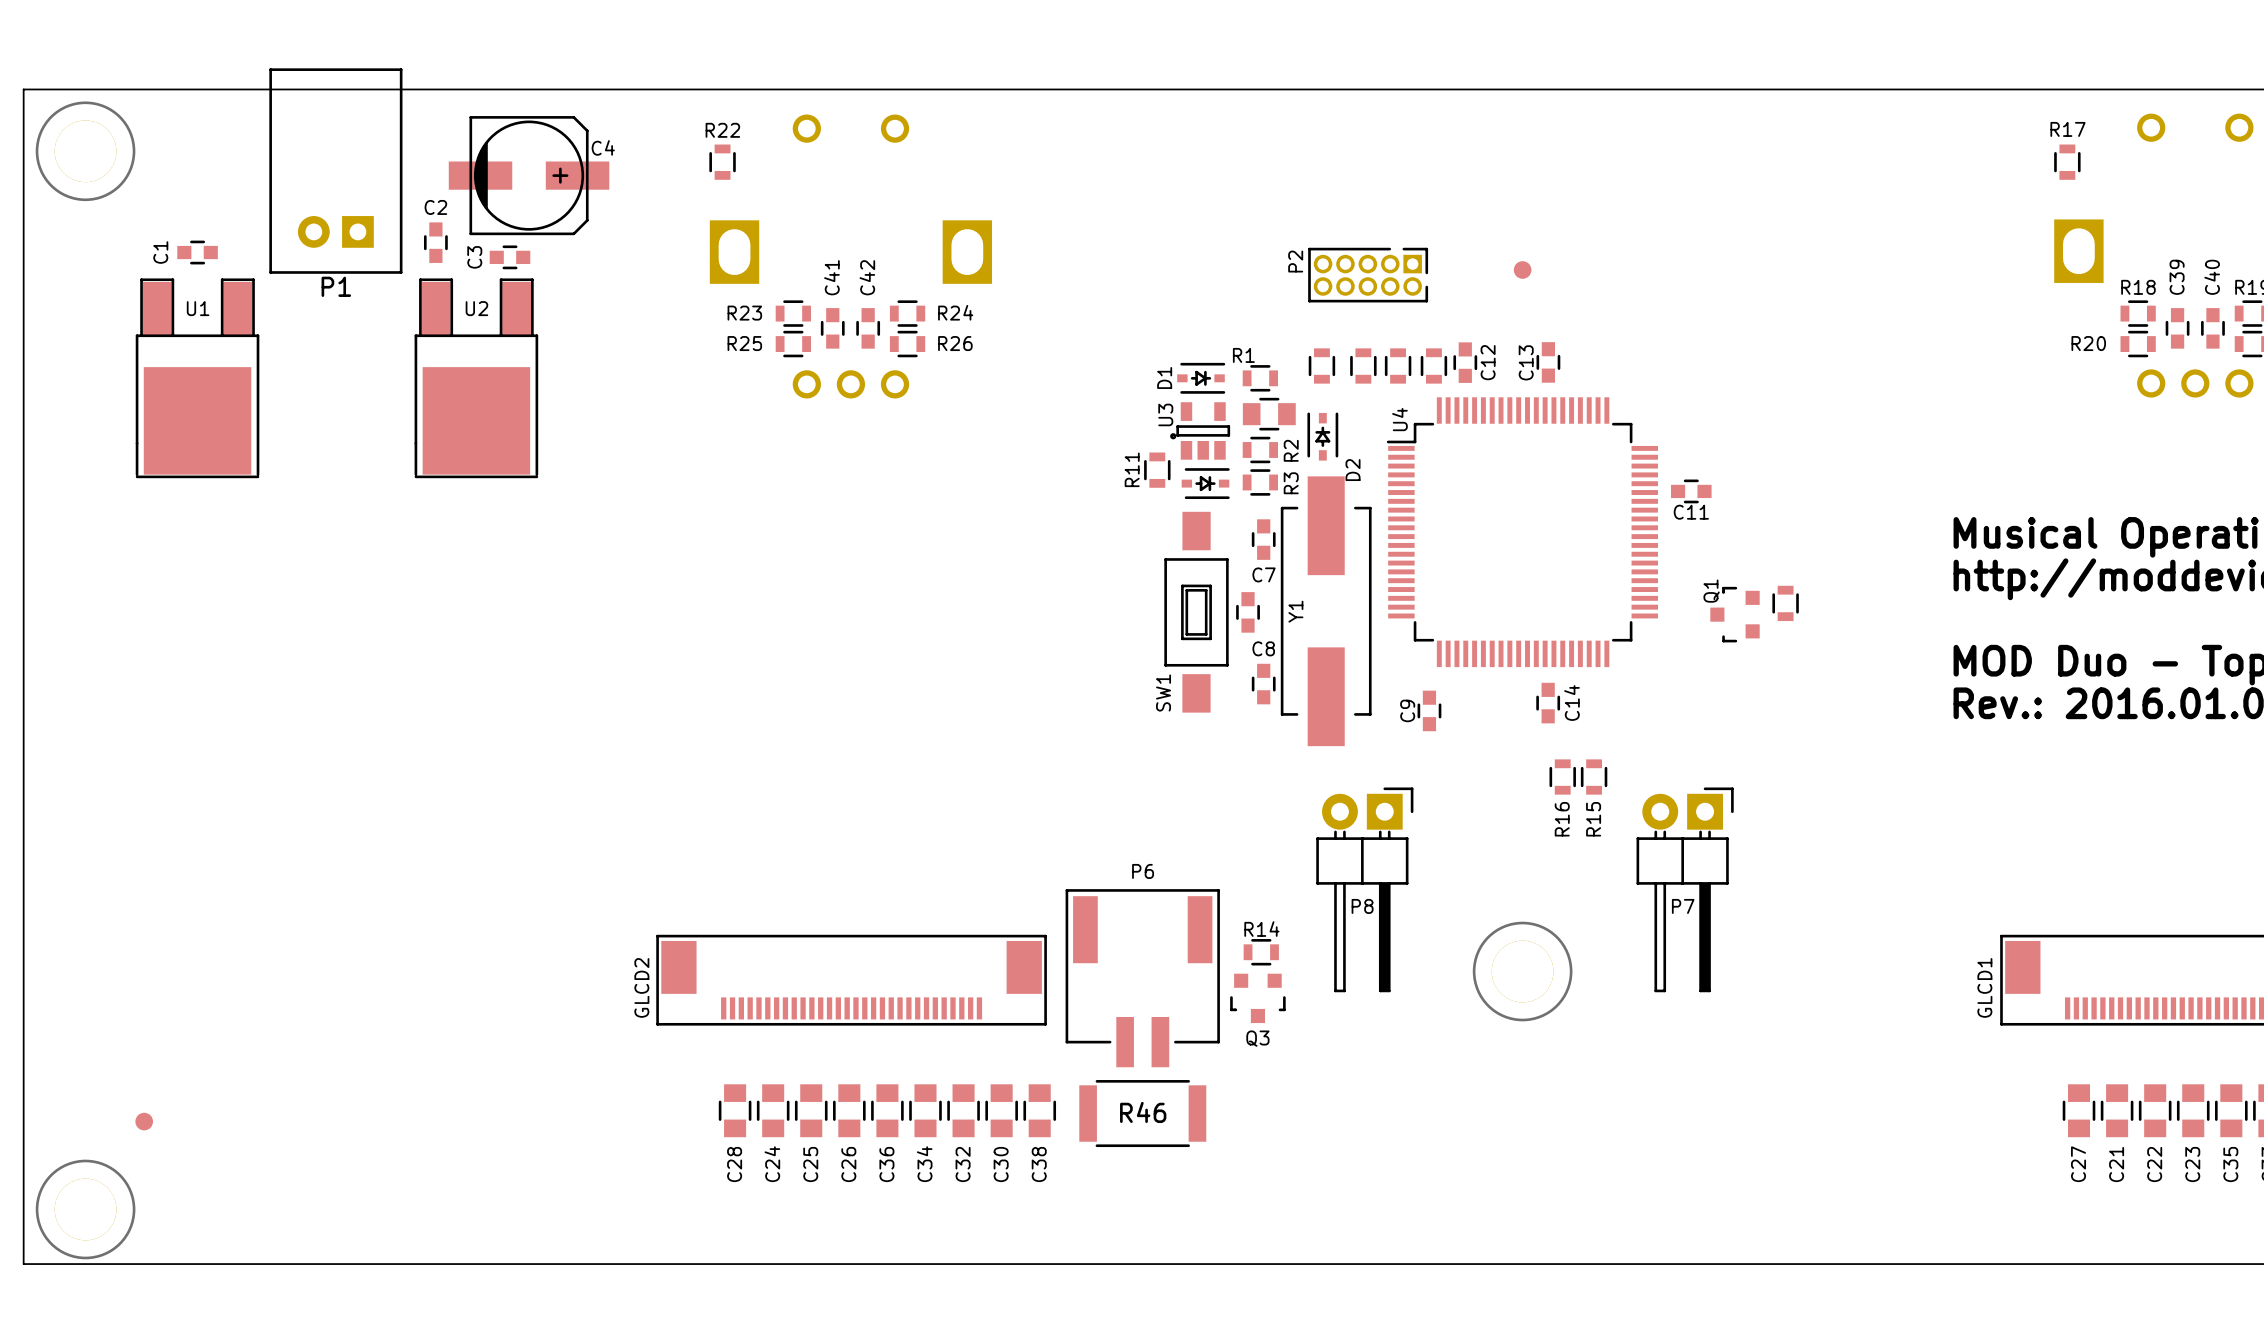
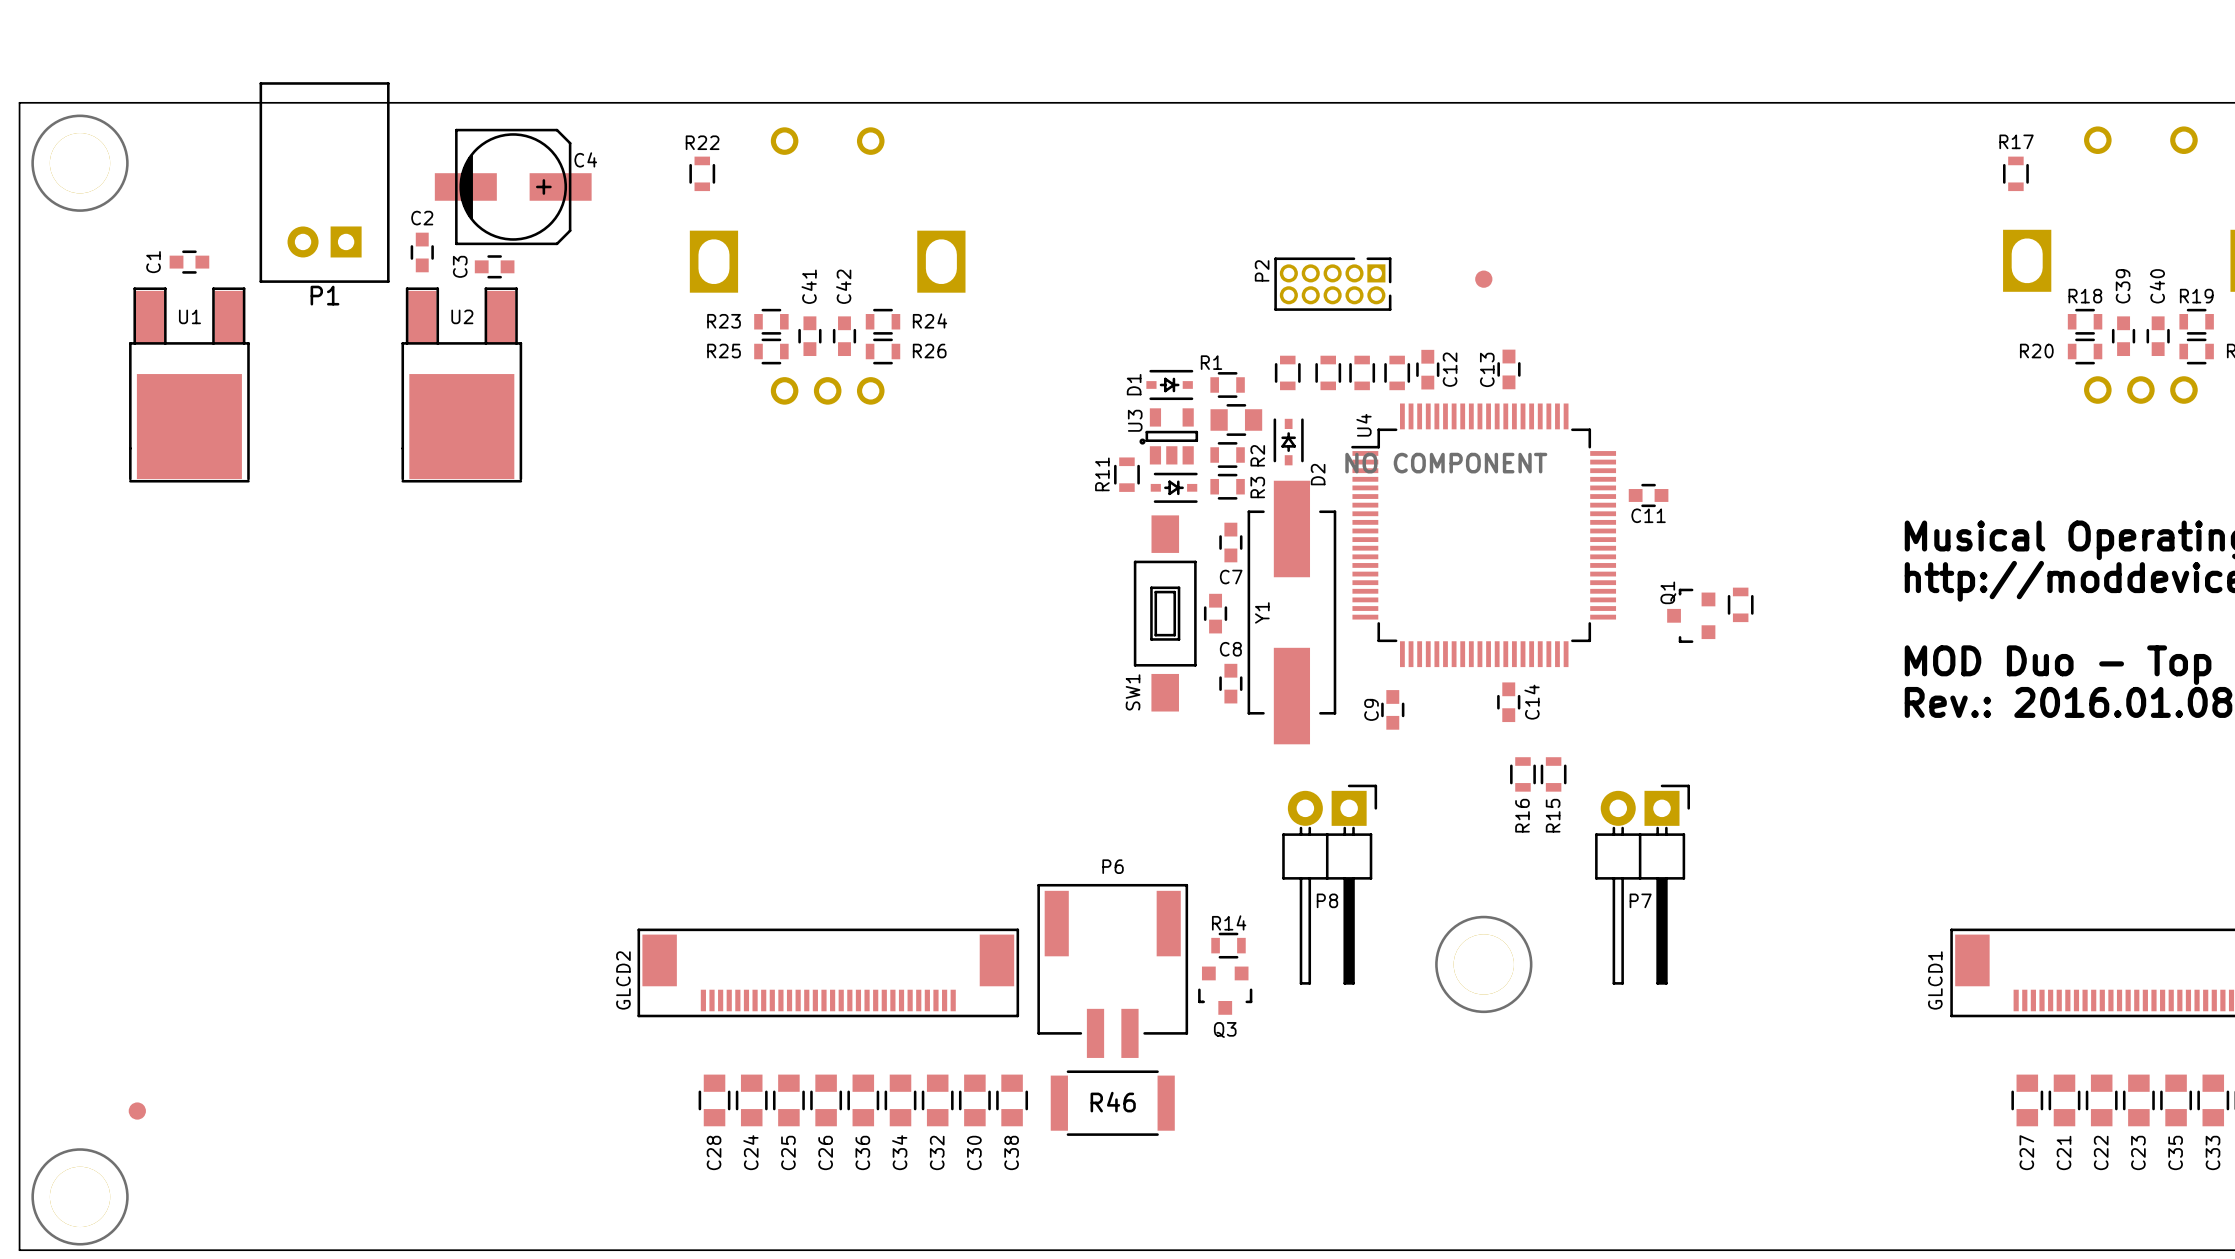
text: none -> NO COMPONENT (1446, 463)

